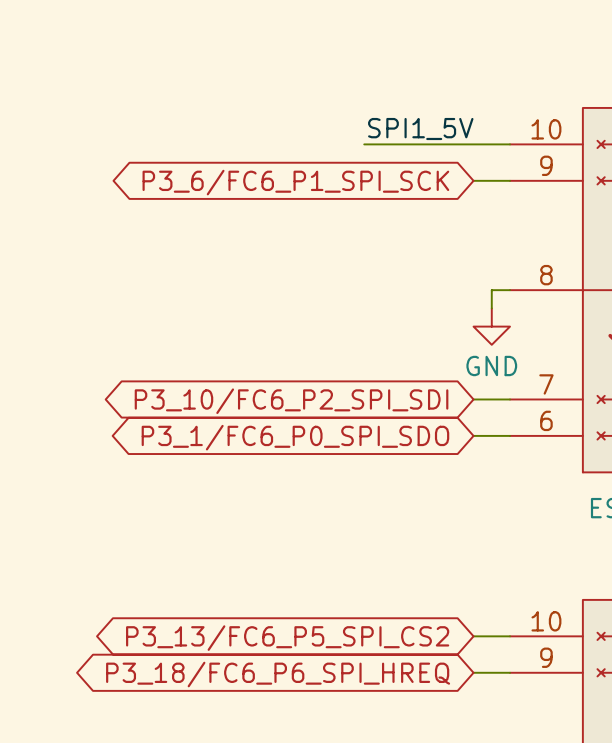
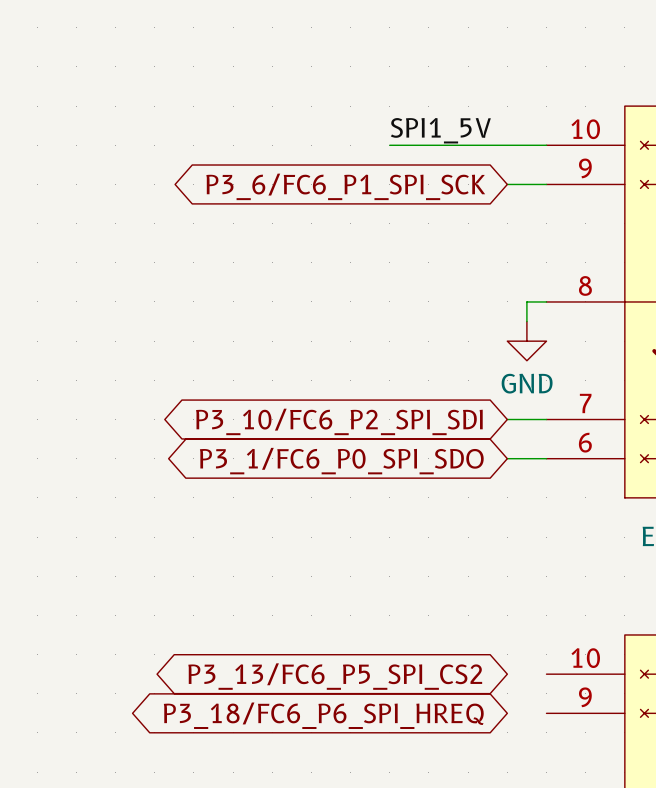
wire: (473, 636) (510, 636) -> none
wire: (473, 672) (510, 672) -> none

